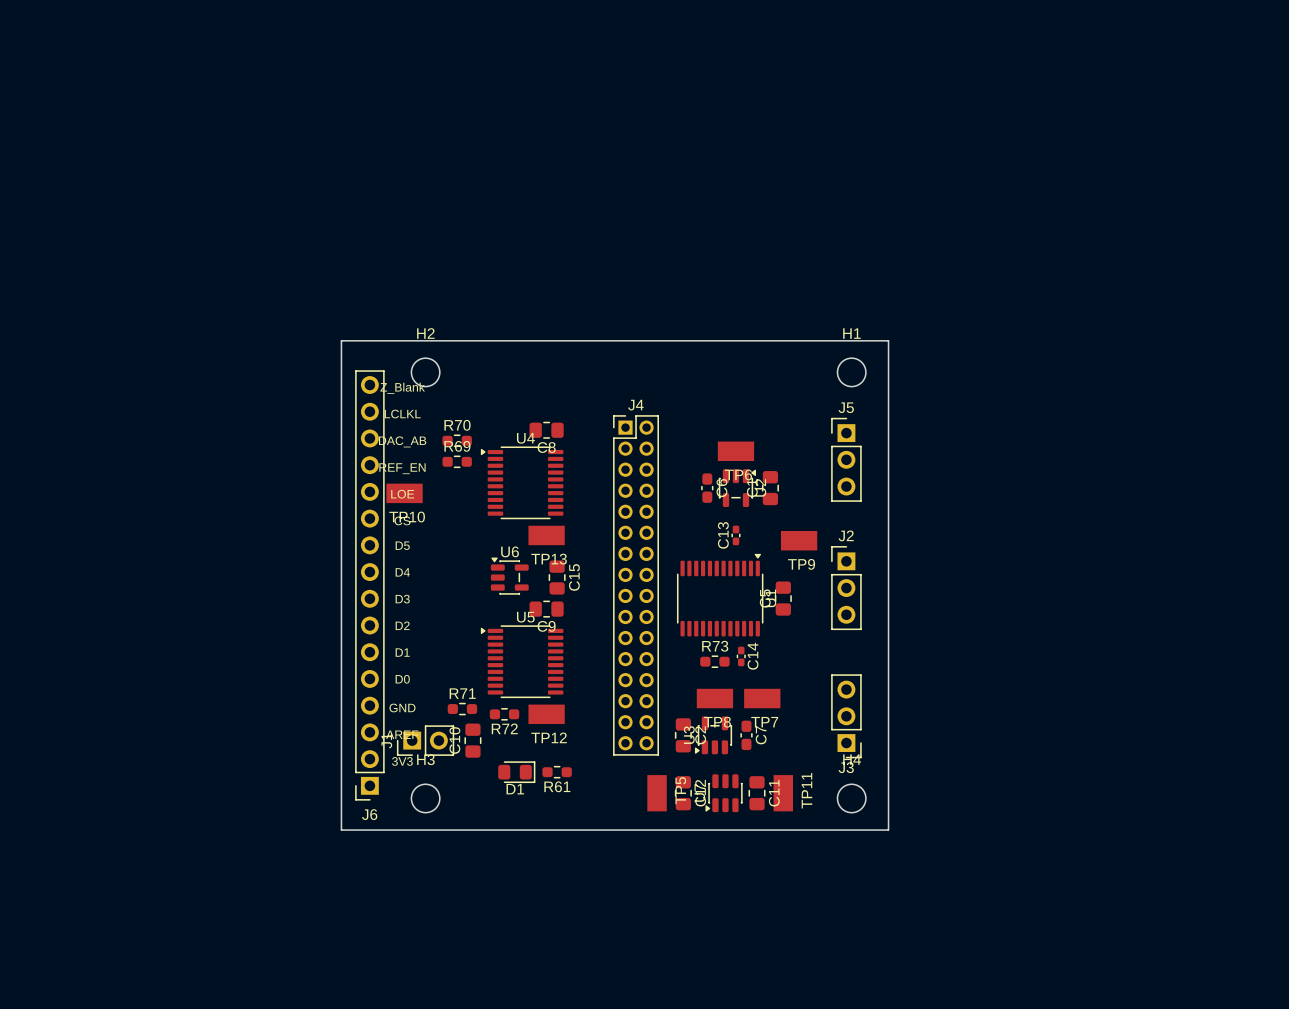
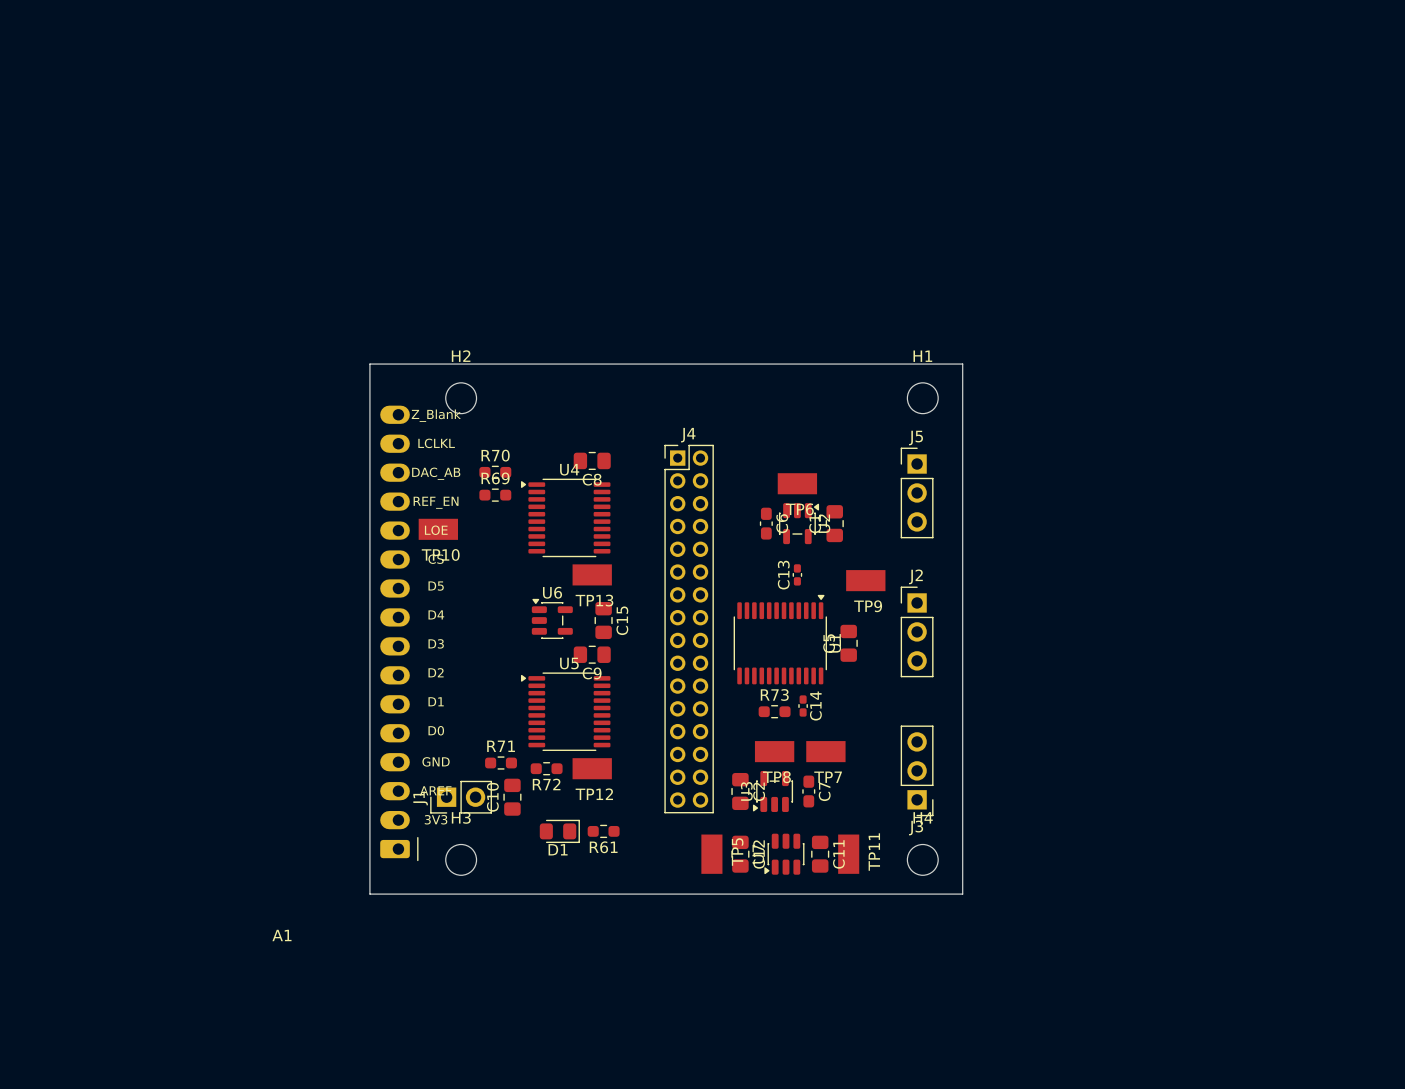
J6: (369, 585) -> none
A1: none -> (399, 633)

